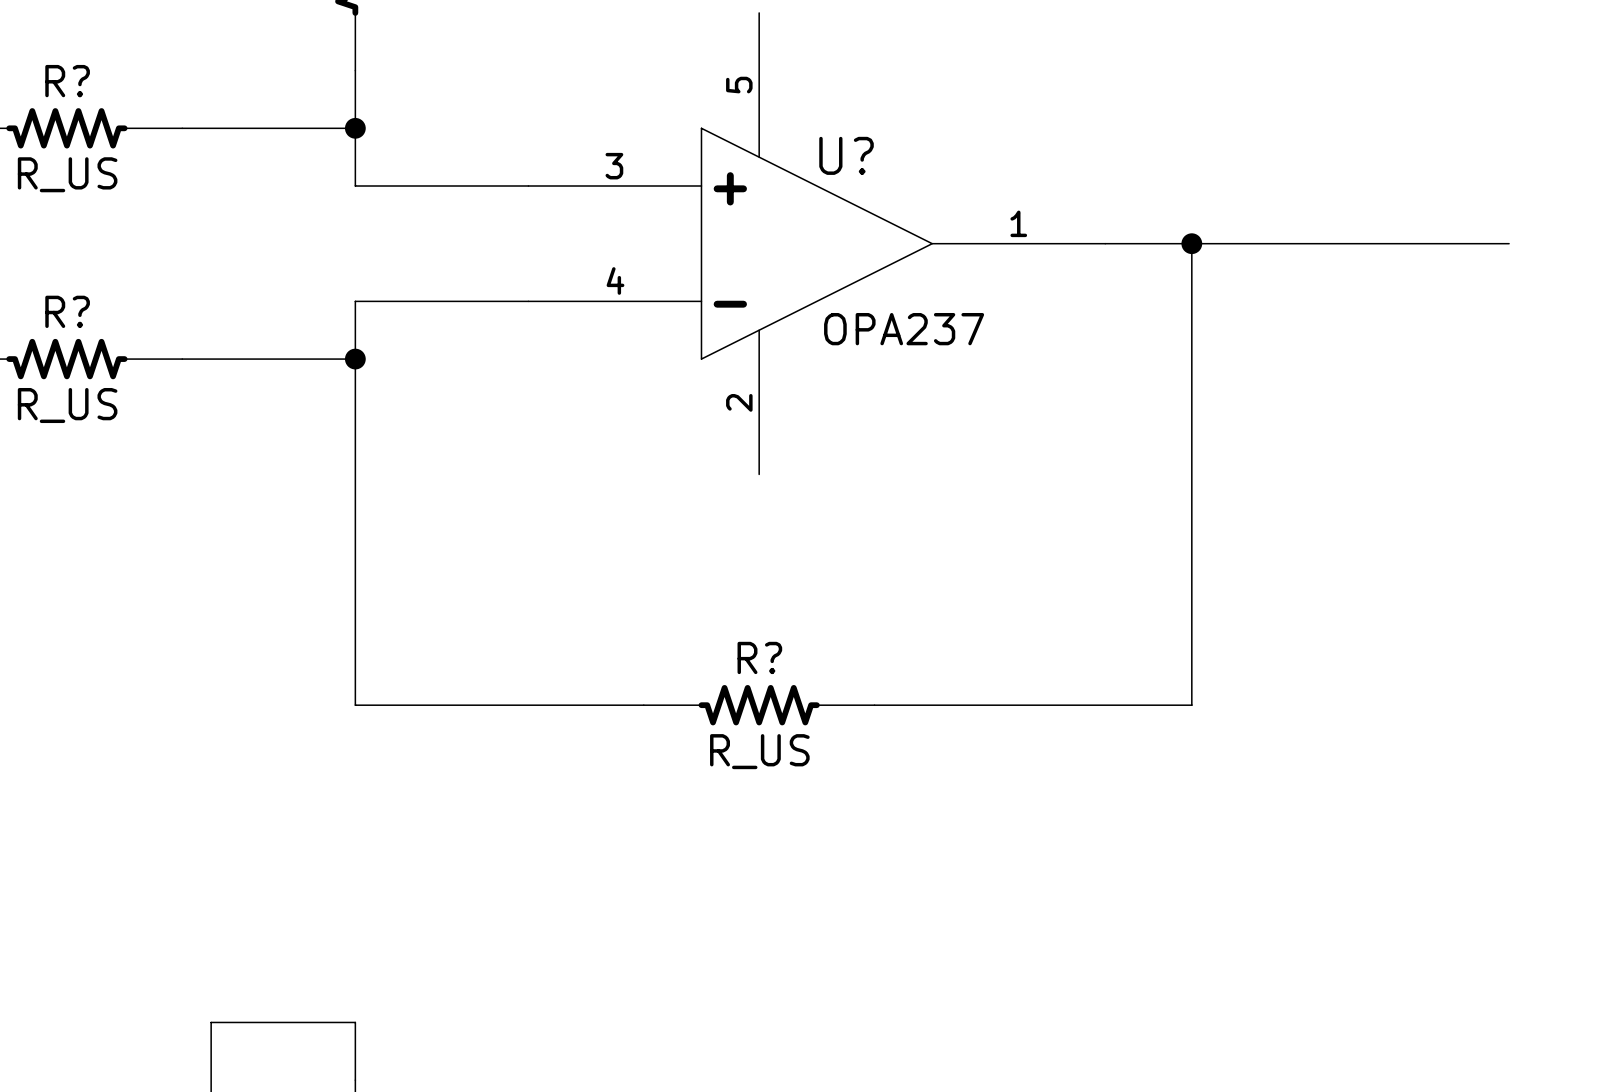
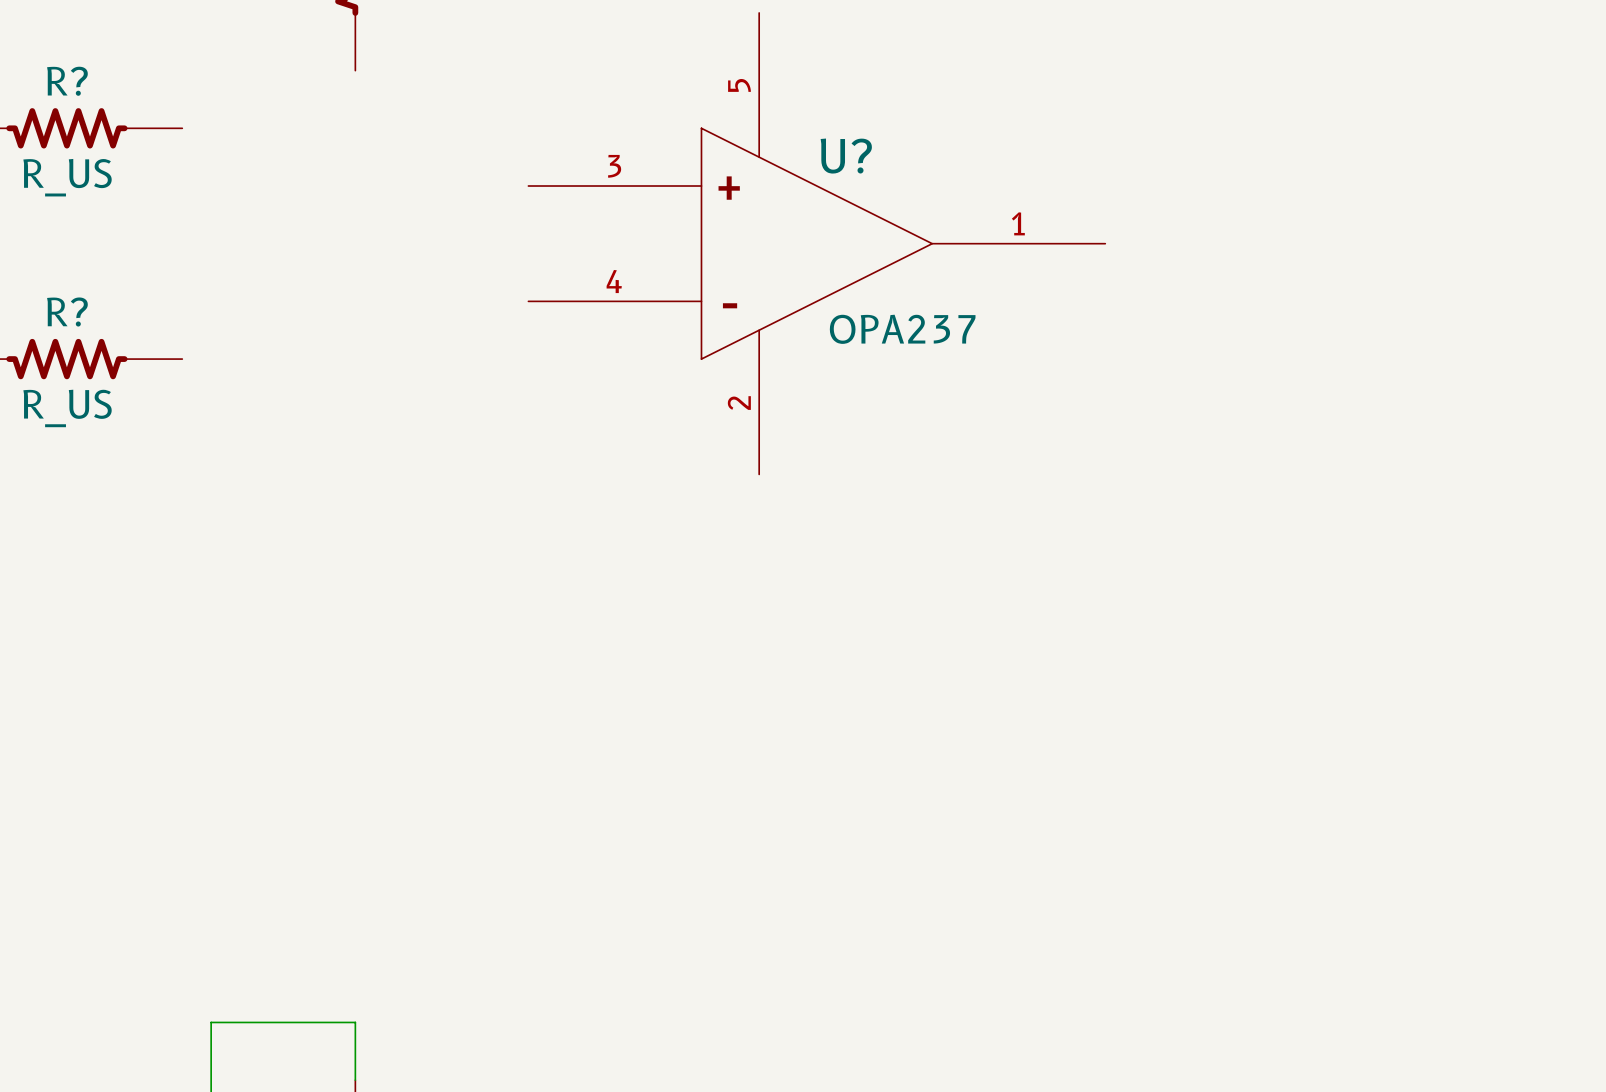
wire: (355, 70) (355, 186) (528, 186) -> none
wire: (182, 128) (355, 128) -> none
junction: (355, 128) -> none
wire: (1105, 243) (1509, 243) -> none
wire: (1191, 243) (1191, 705) (874, 705) -> none
junction: (1191, 243) -> none
wire: (528, 301) (355, 301) (355, 705) (643, 705) -> none
wire: (182, 359) (355, 359) -> none
junction: (355, 359) -> none
R?: R_US (759, 705) -> none

